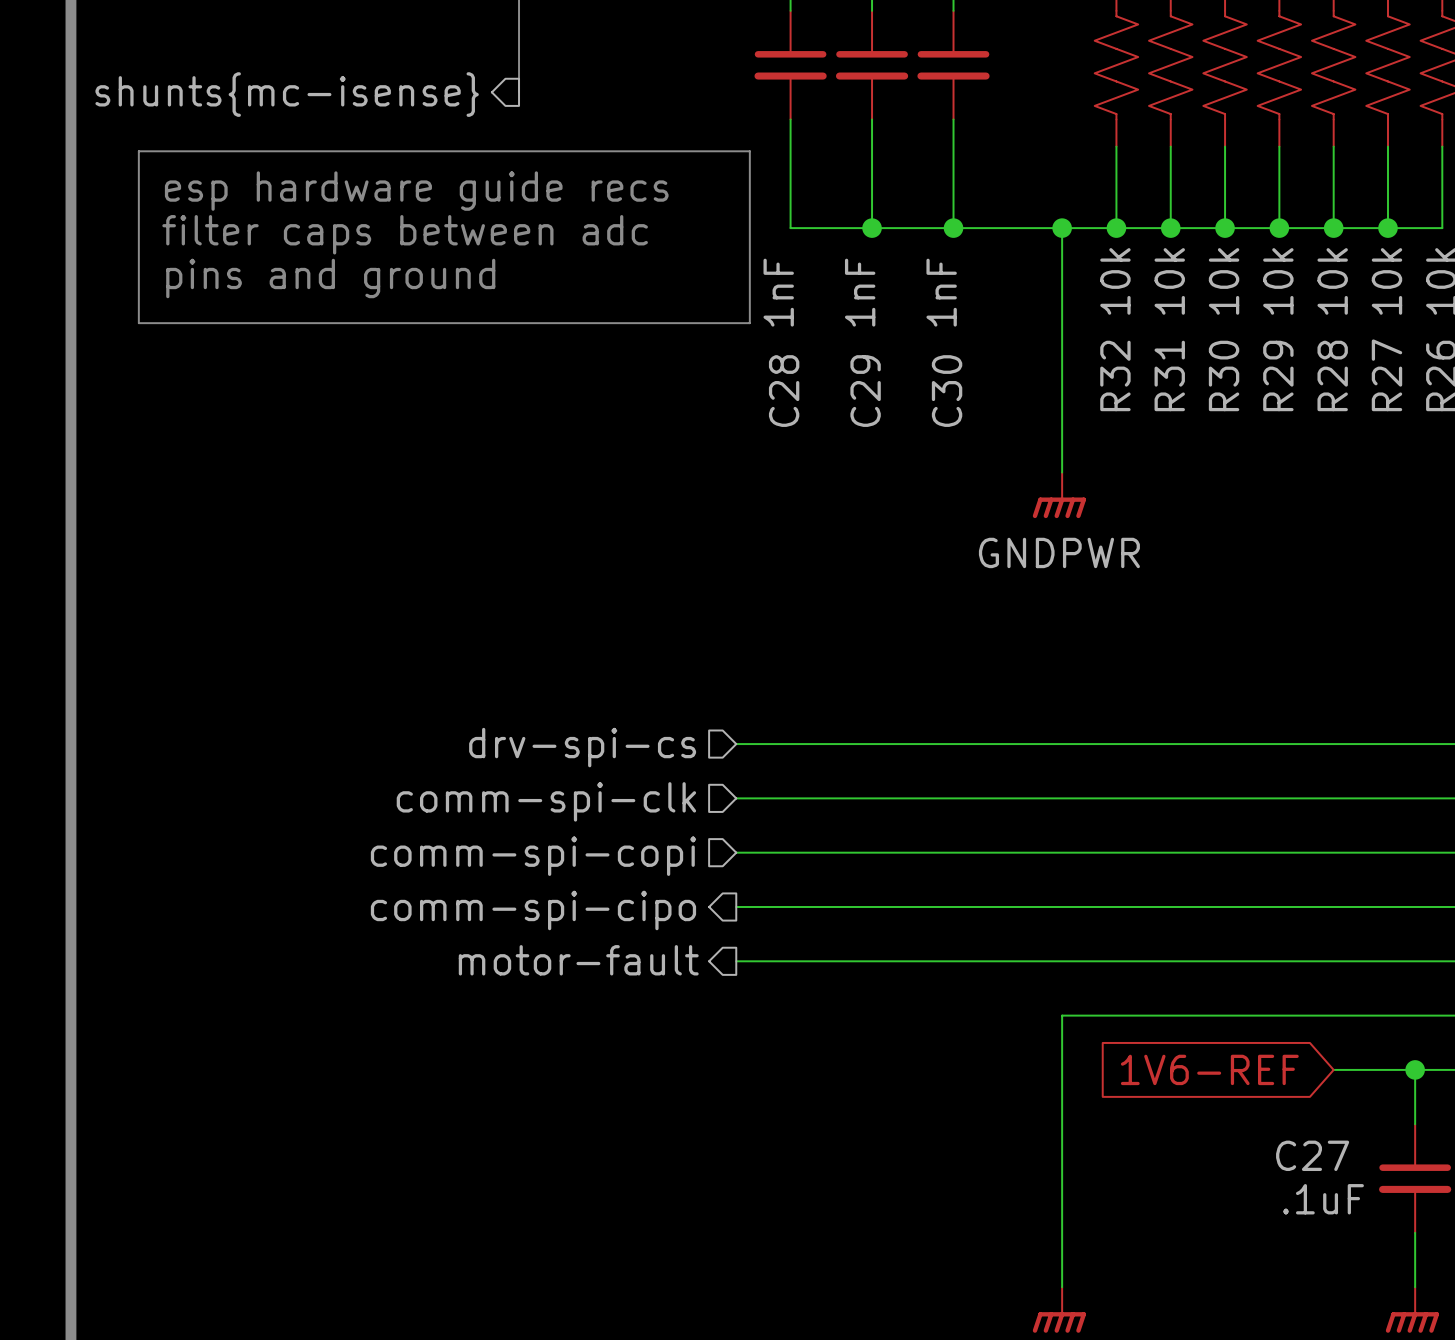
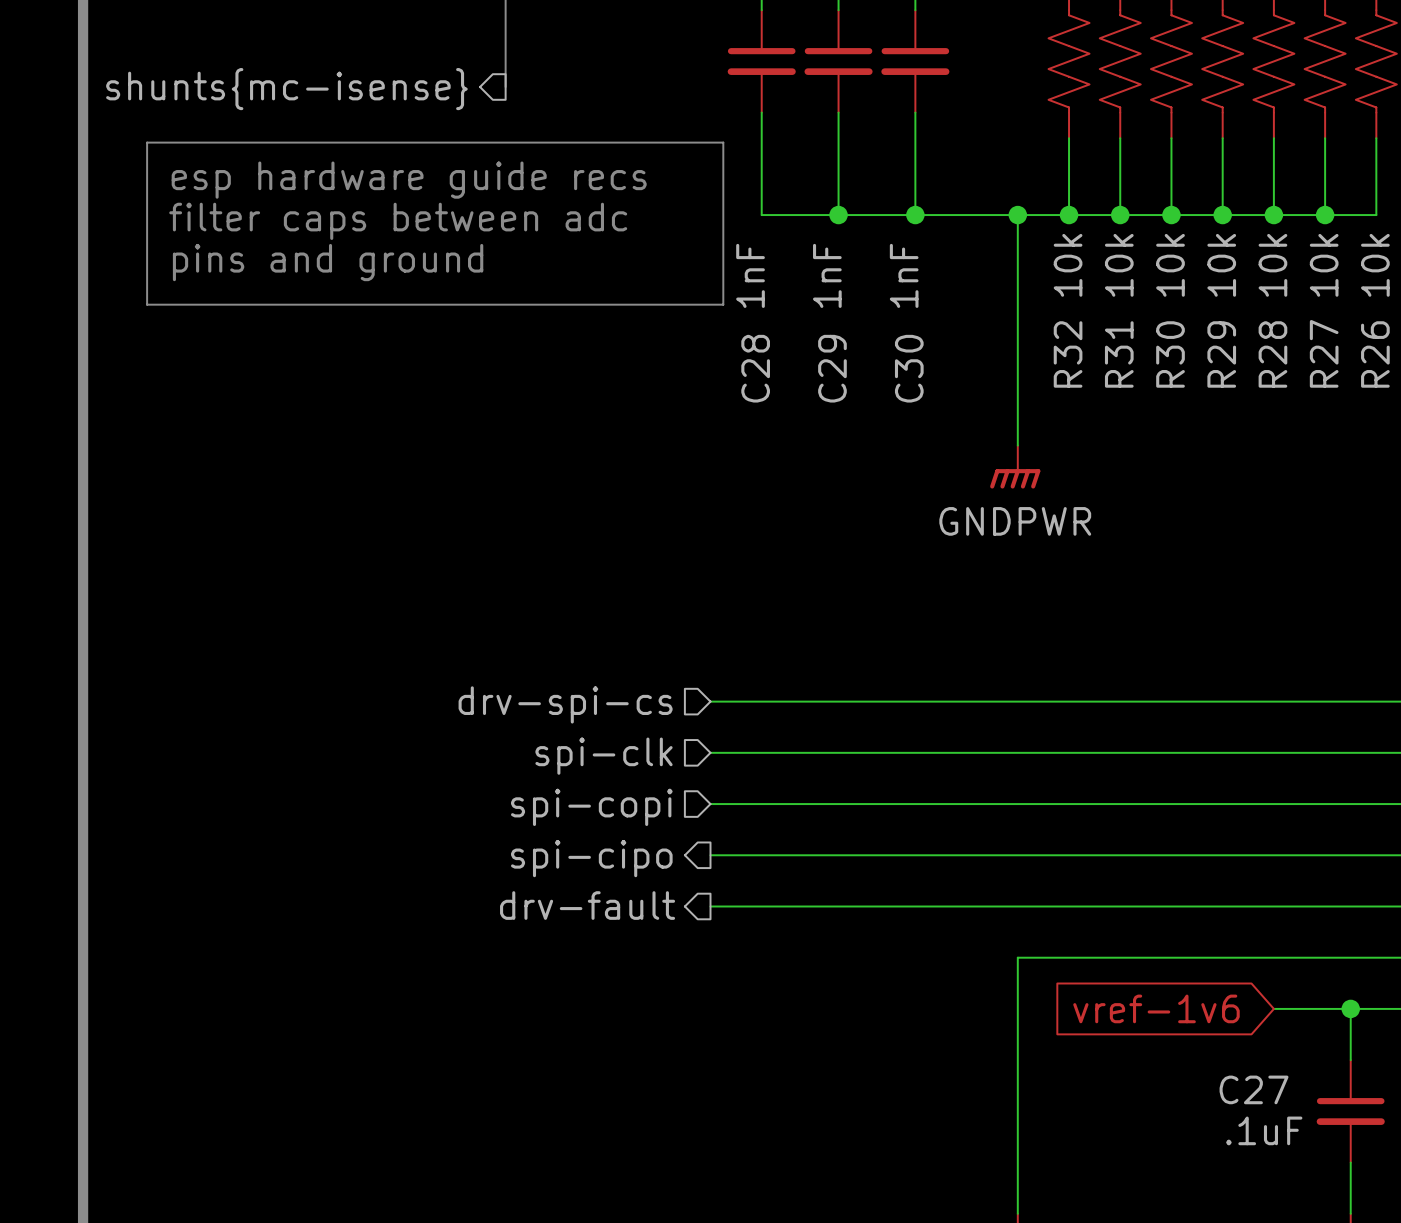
hierarchical label: comm-spi-clk (546, 801) -> spi-clk (604, 756)
hierarchical label: comm-spi-copi (533, 856) -> spi-copi (591, 807)
hierarchical label: comm-spi-cipo (533, 910) -> spi-cipo (591, 858)
hierarchical label: motor-fault (578, 960) -> drv-fault (587, 905)
global label: 1V6-REF (1209, 1069) -> vref-1v6 (1156, 1008)

